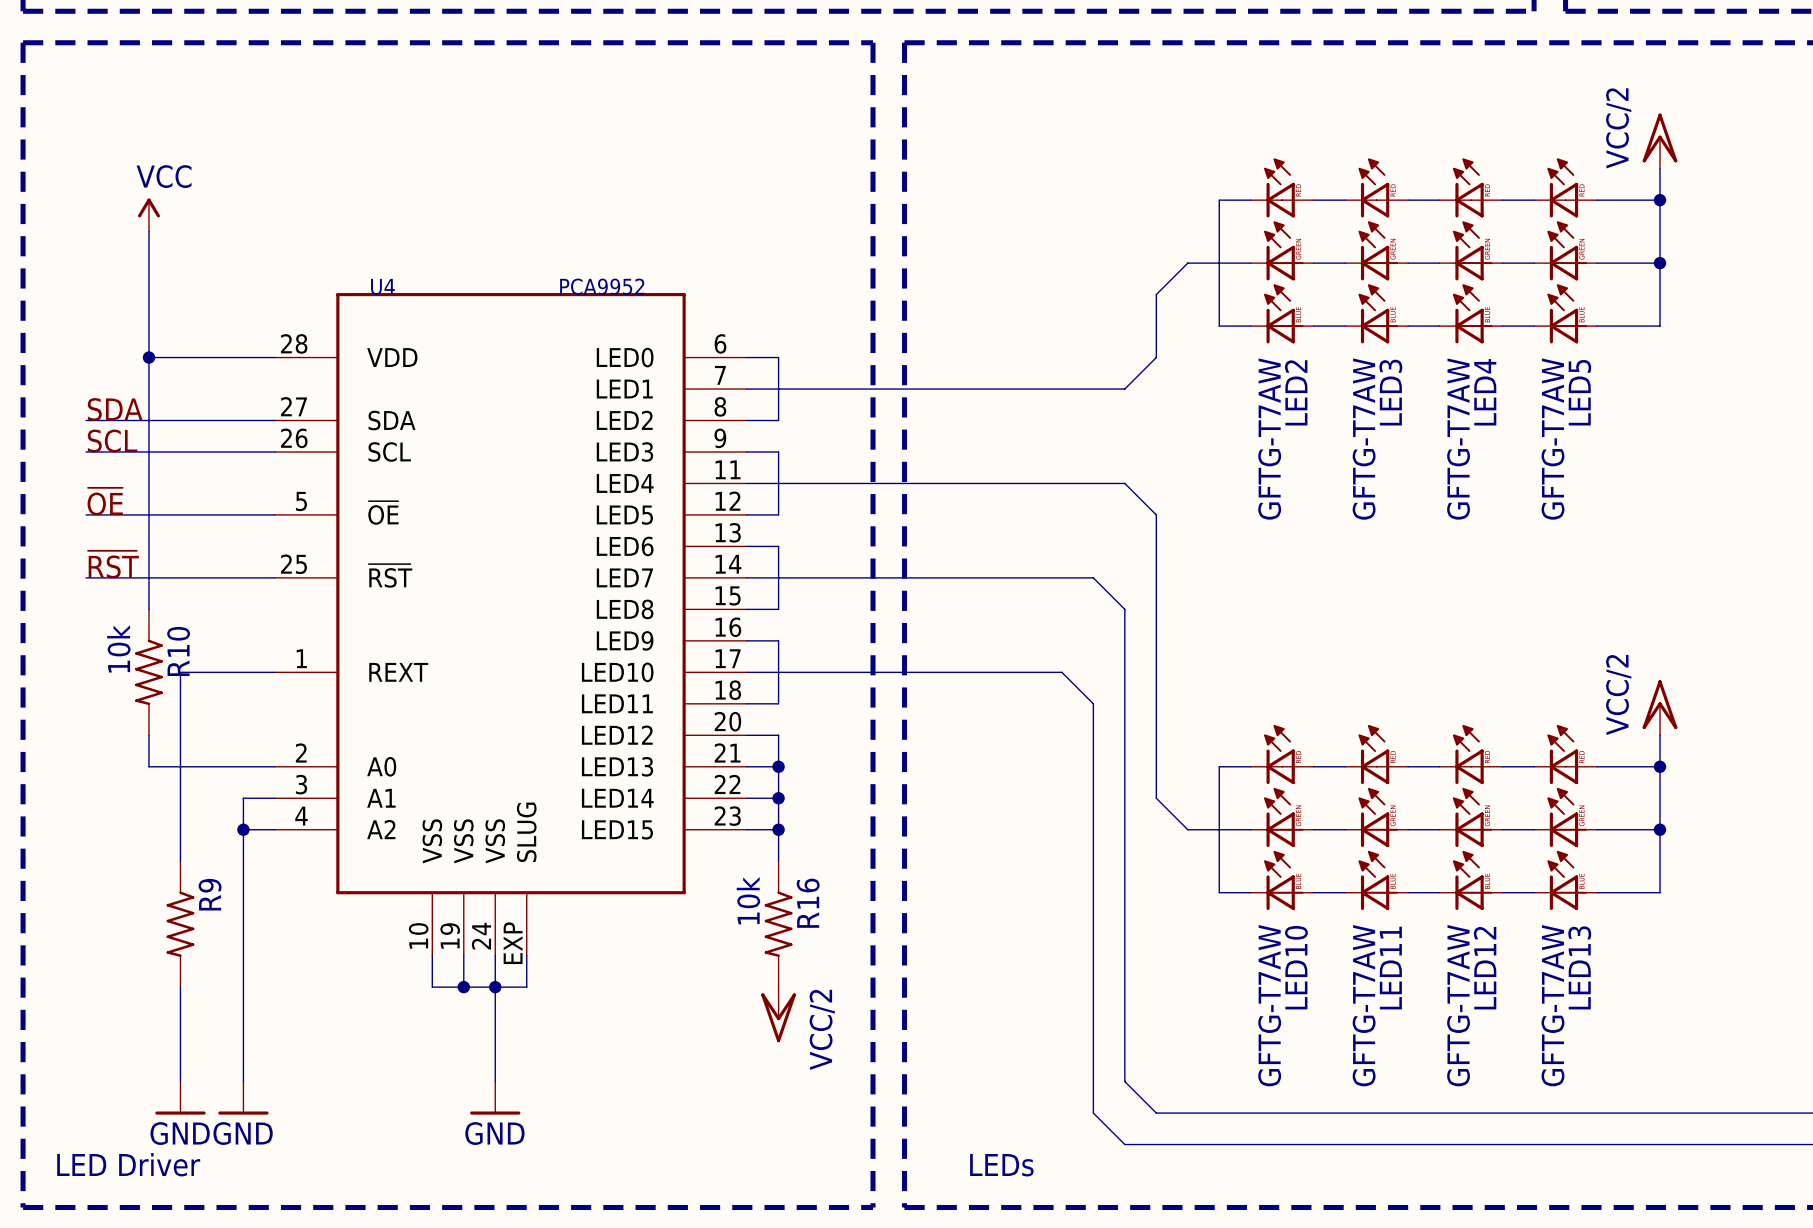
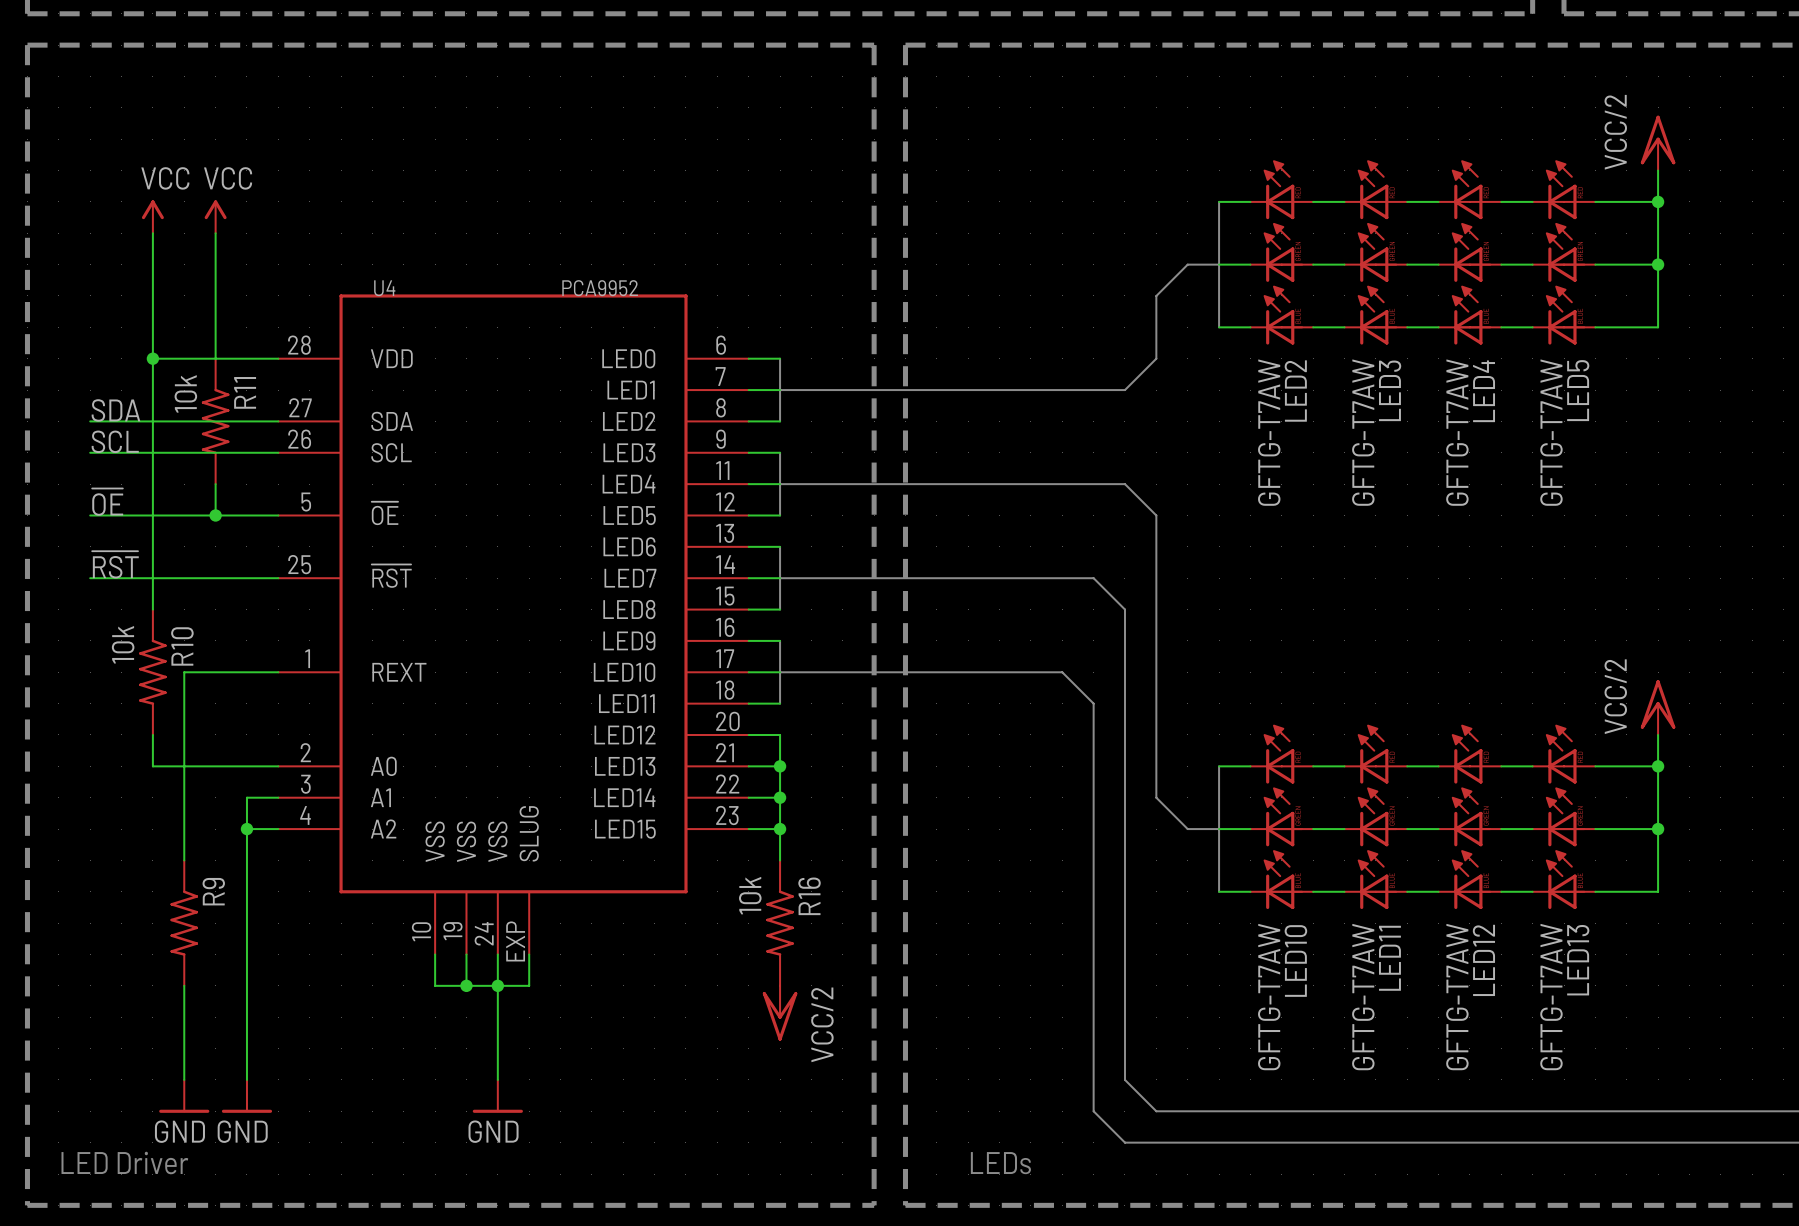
power symbol: none -> VCC (215, 216)
wire: none -> (215, 233) (215, 358)
R11: none -> 10k (215, 421)
wire: none -> (215, 484) (215, 515)
junction: none -> (215, 515)

